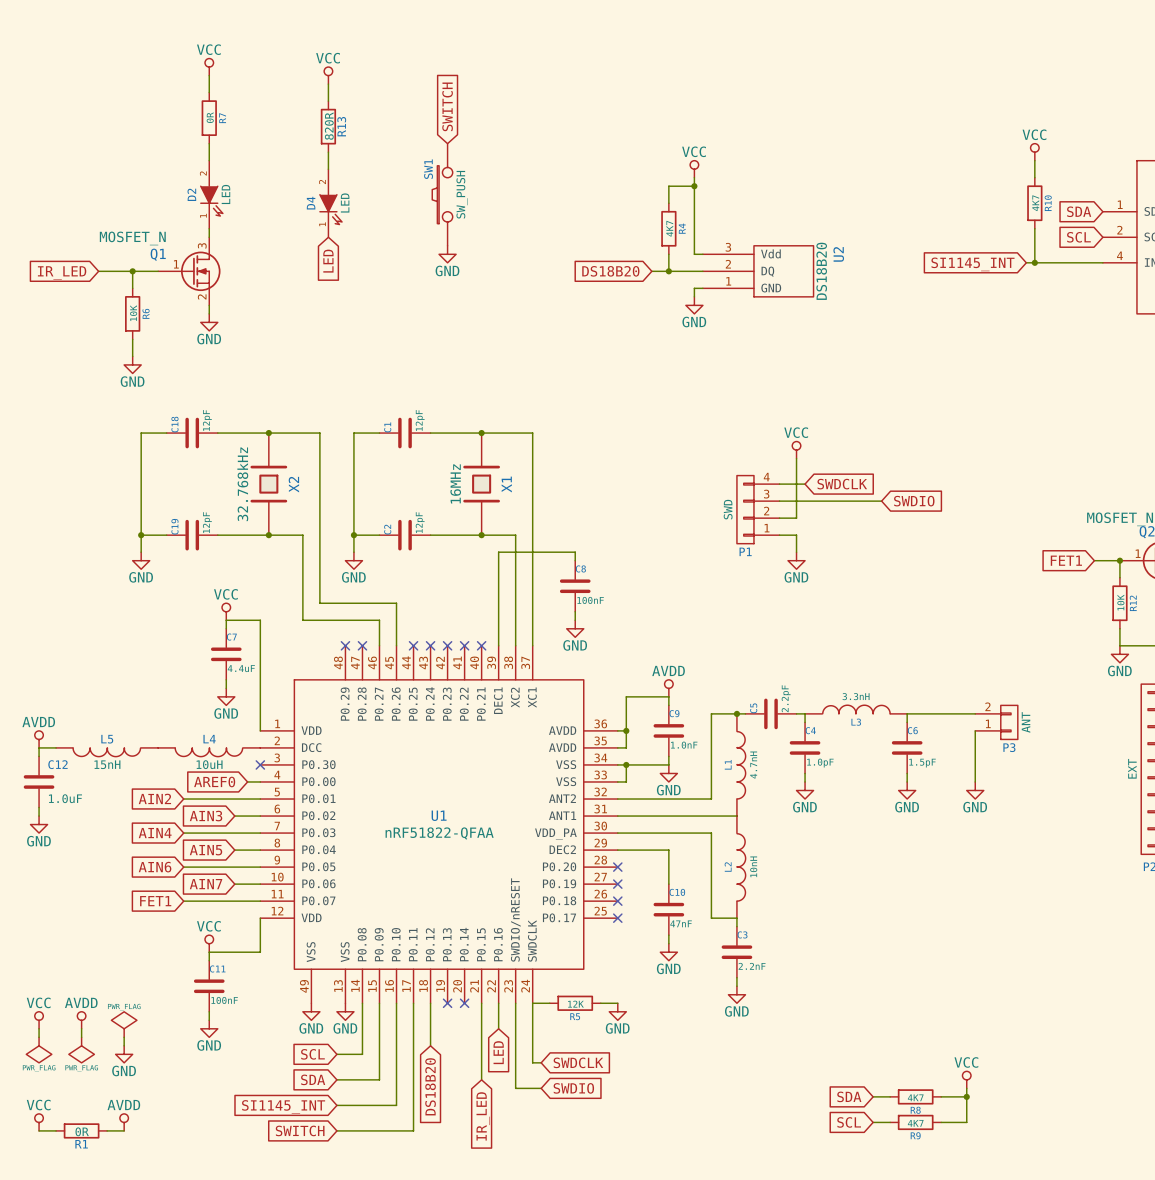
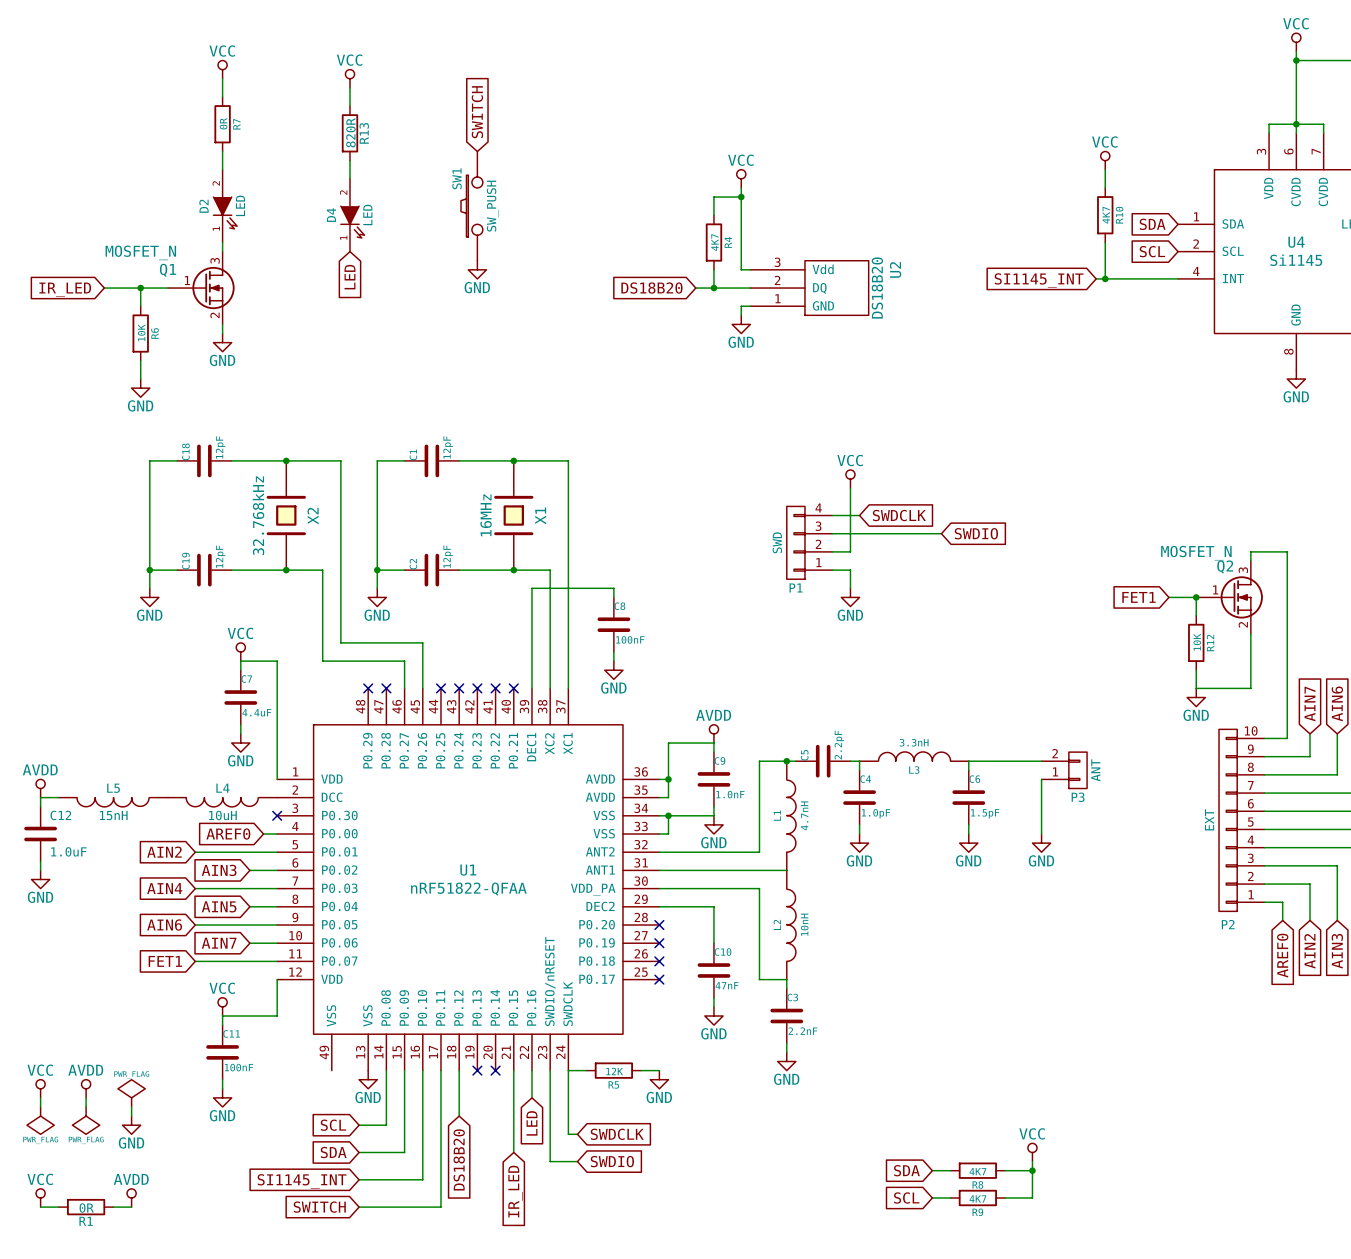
power symbol: GND (311, 1011) -> none

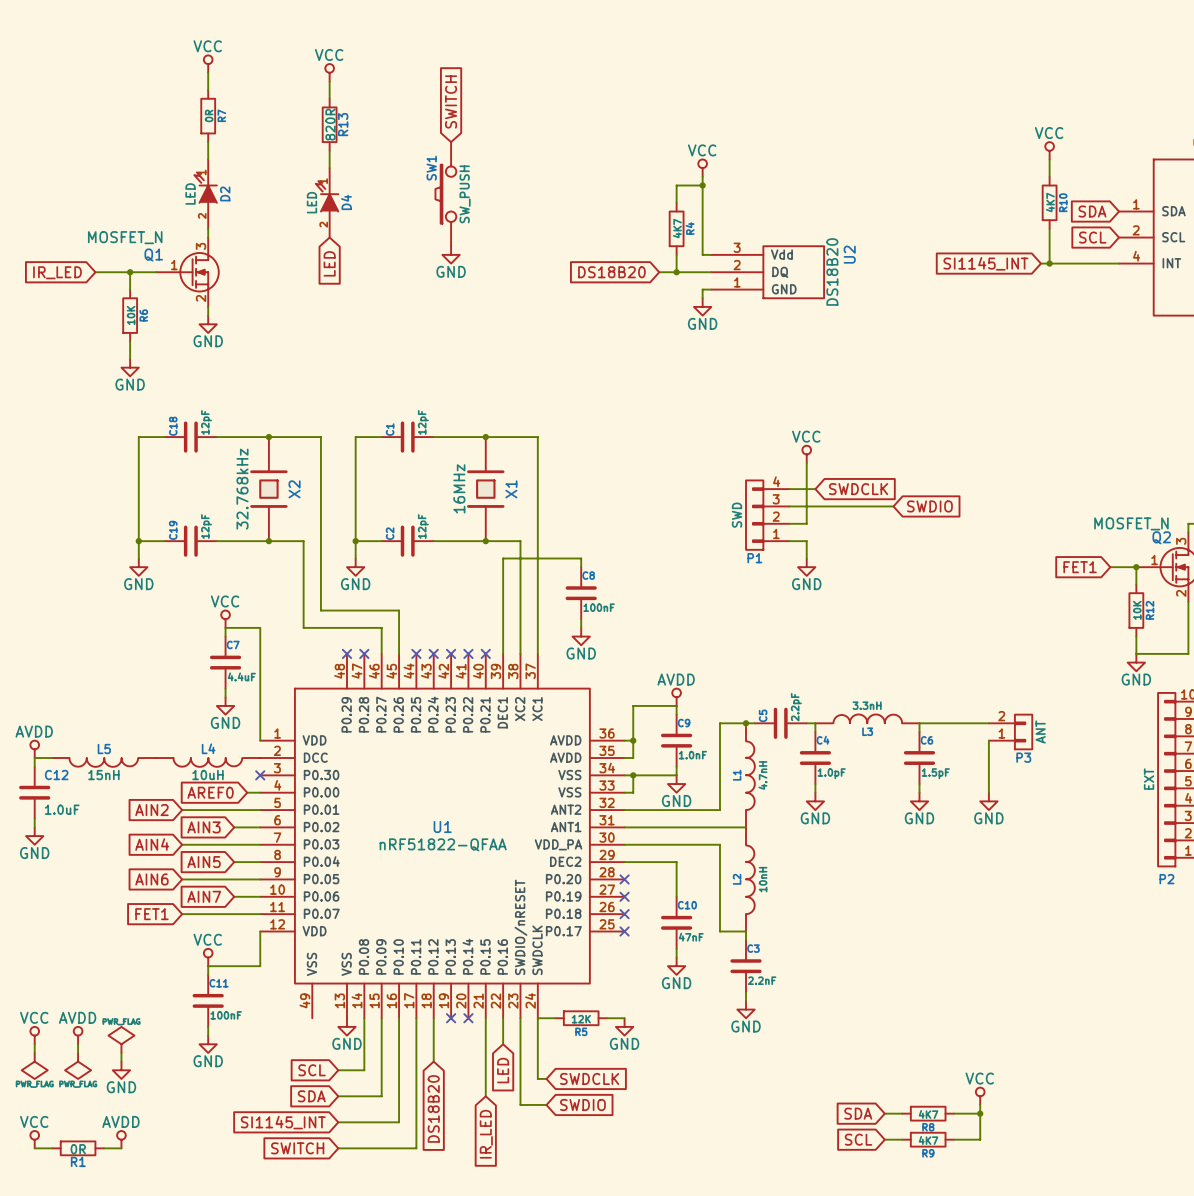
D2 rotation: 0° (225, 212) -> 180° (205, 187)
D4 rotation: 0° (352, 222) -> 180° (327, 196)

